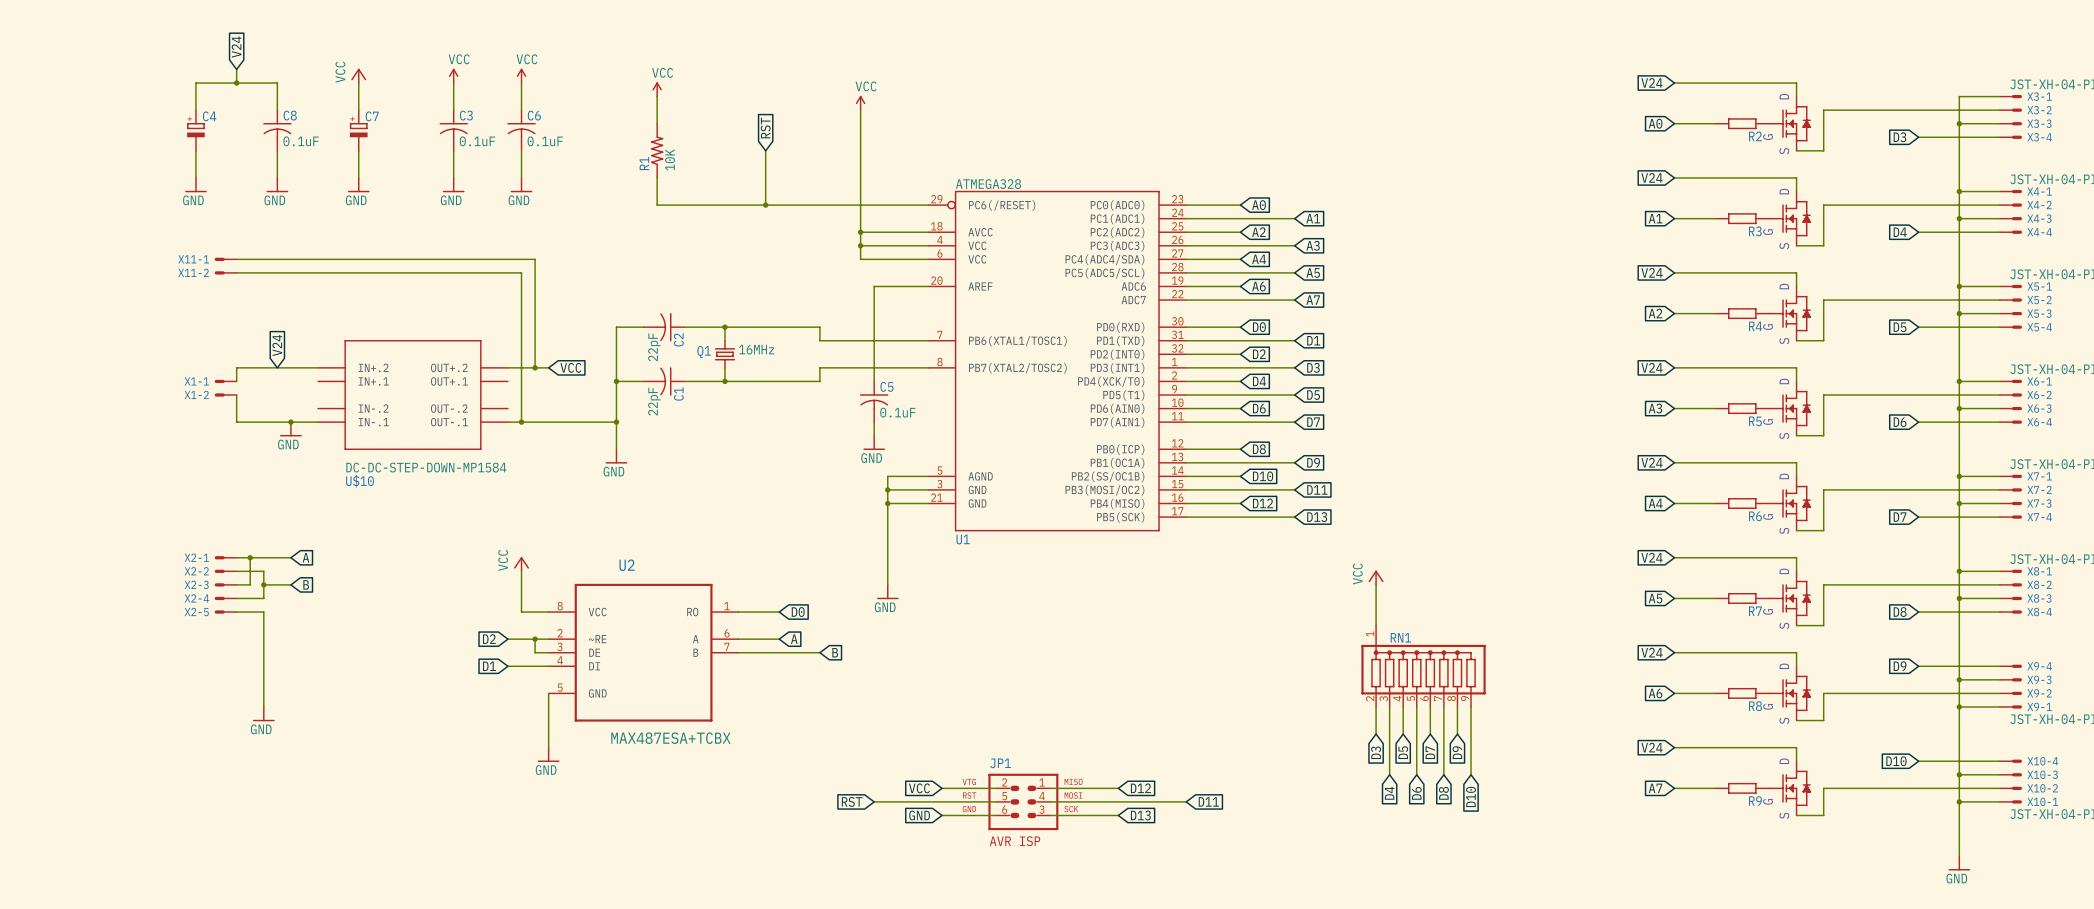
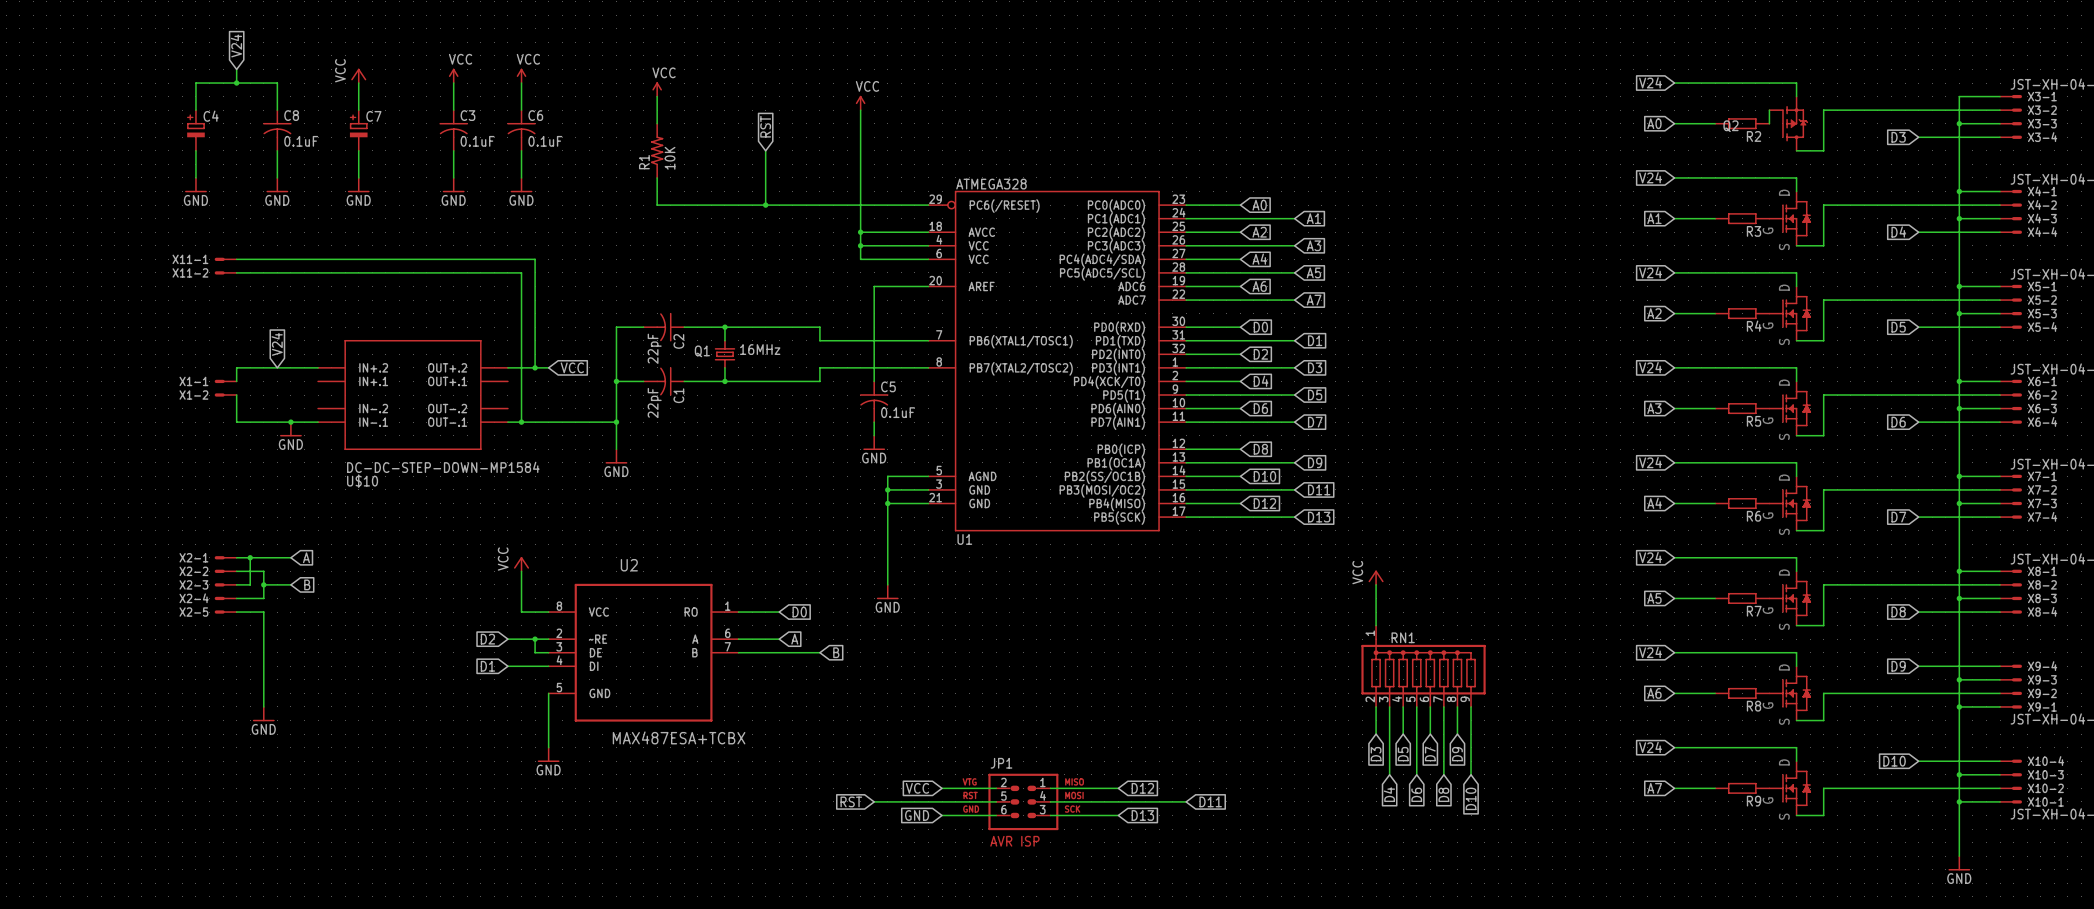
wire: none -> (1769, 110) (1769, 123)
Q2: none -> (1788, 123)
part: (1789, 123) -> none

